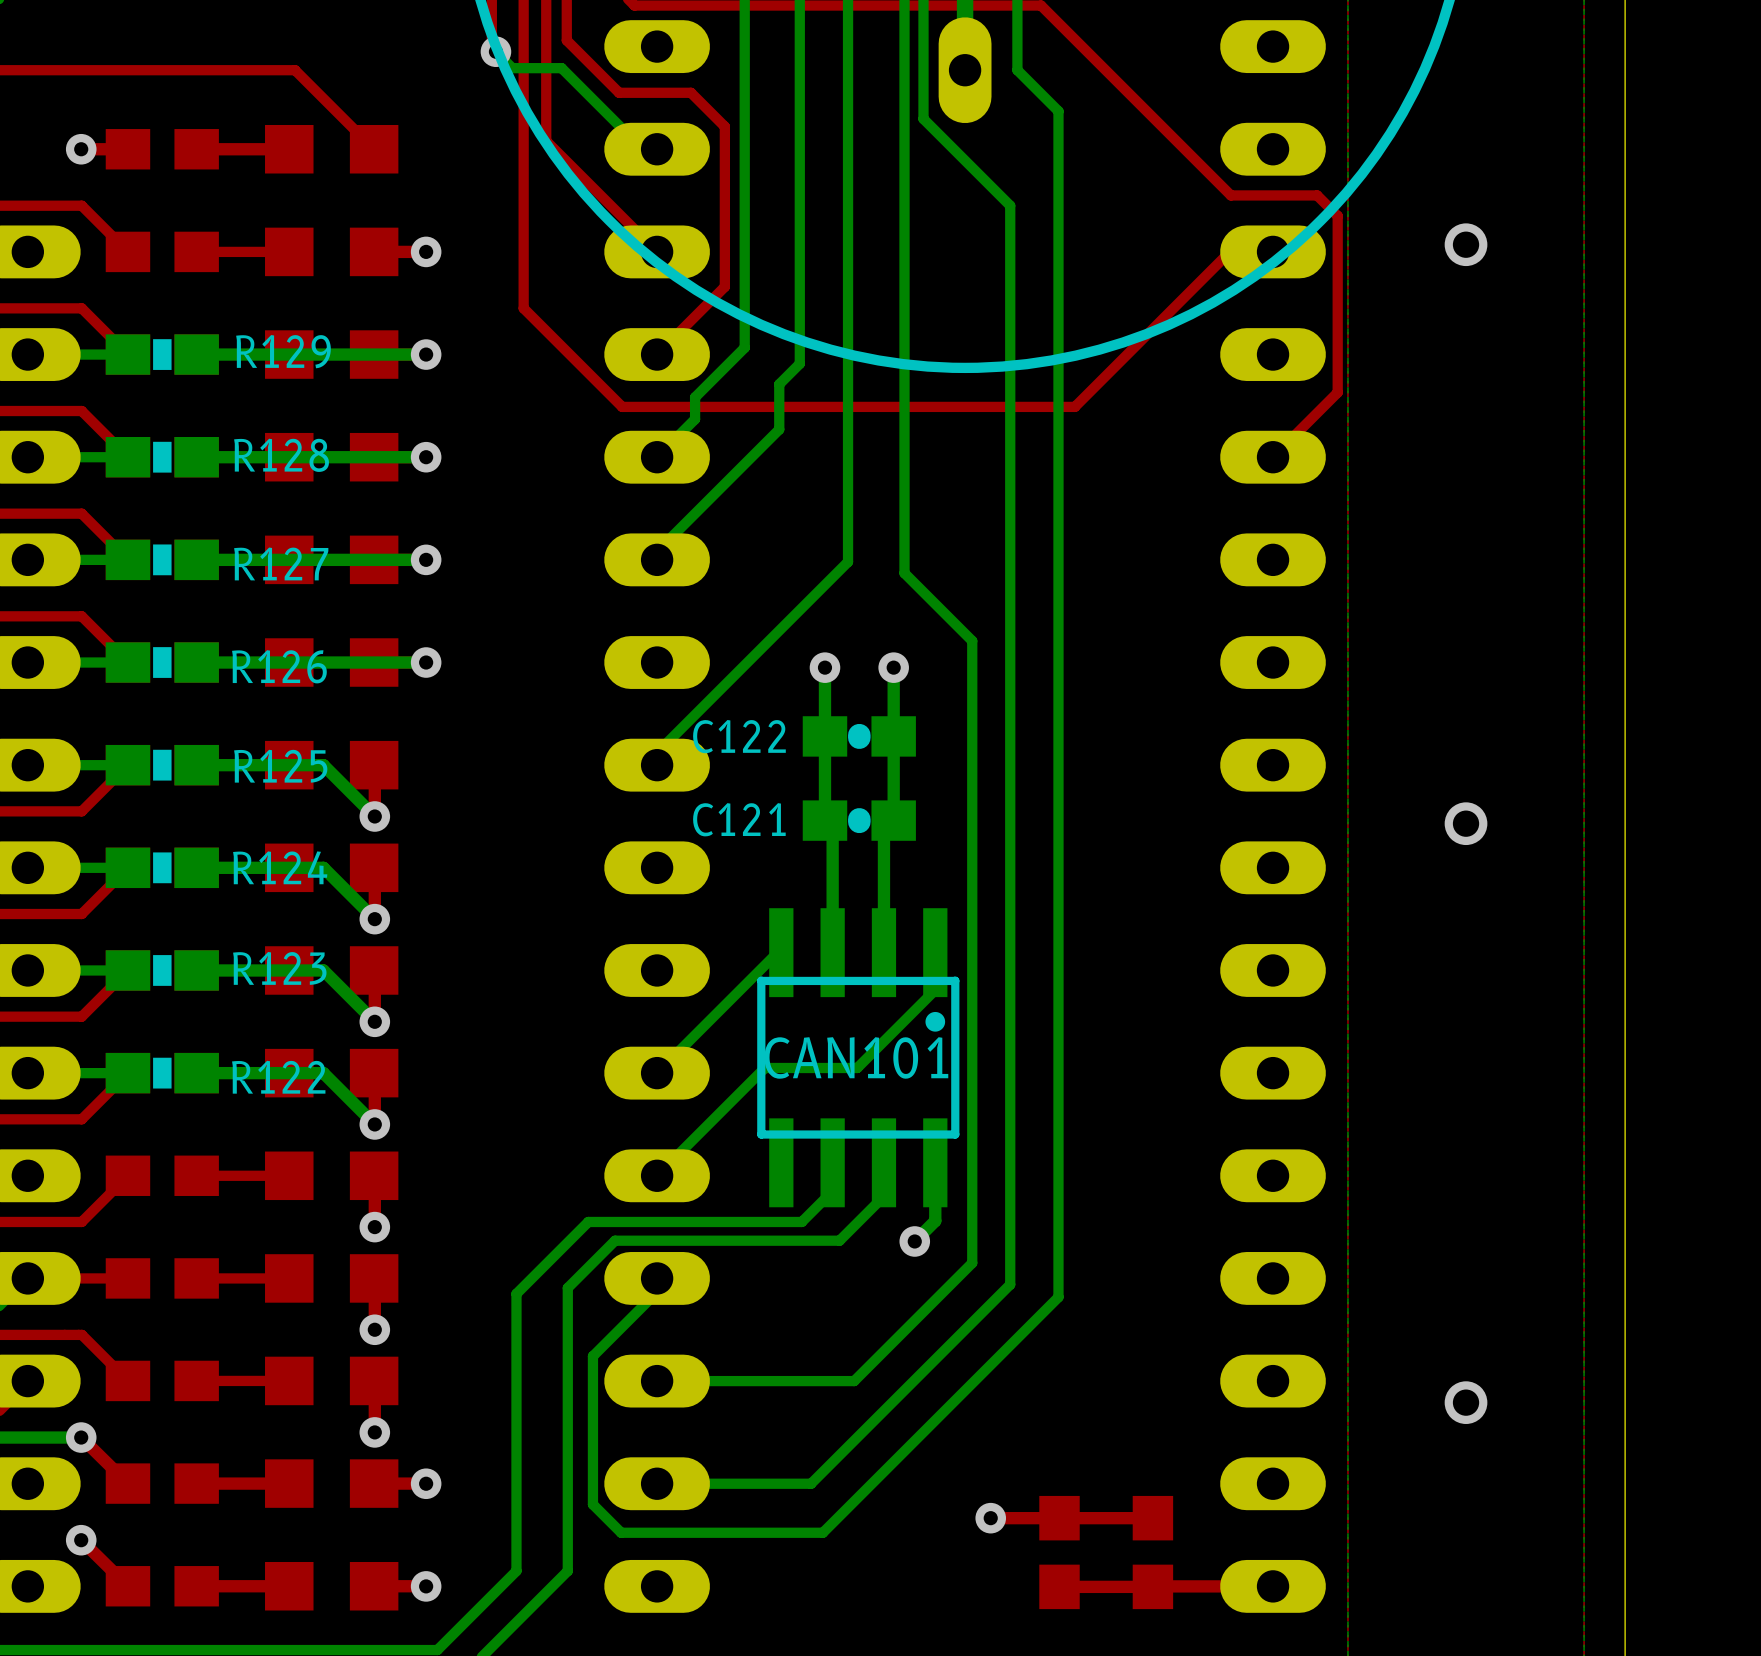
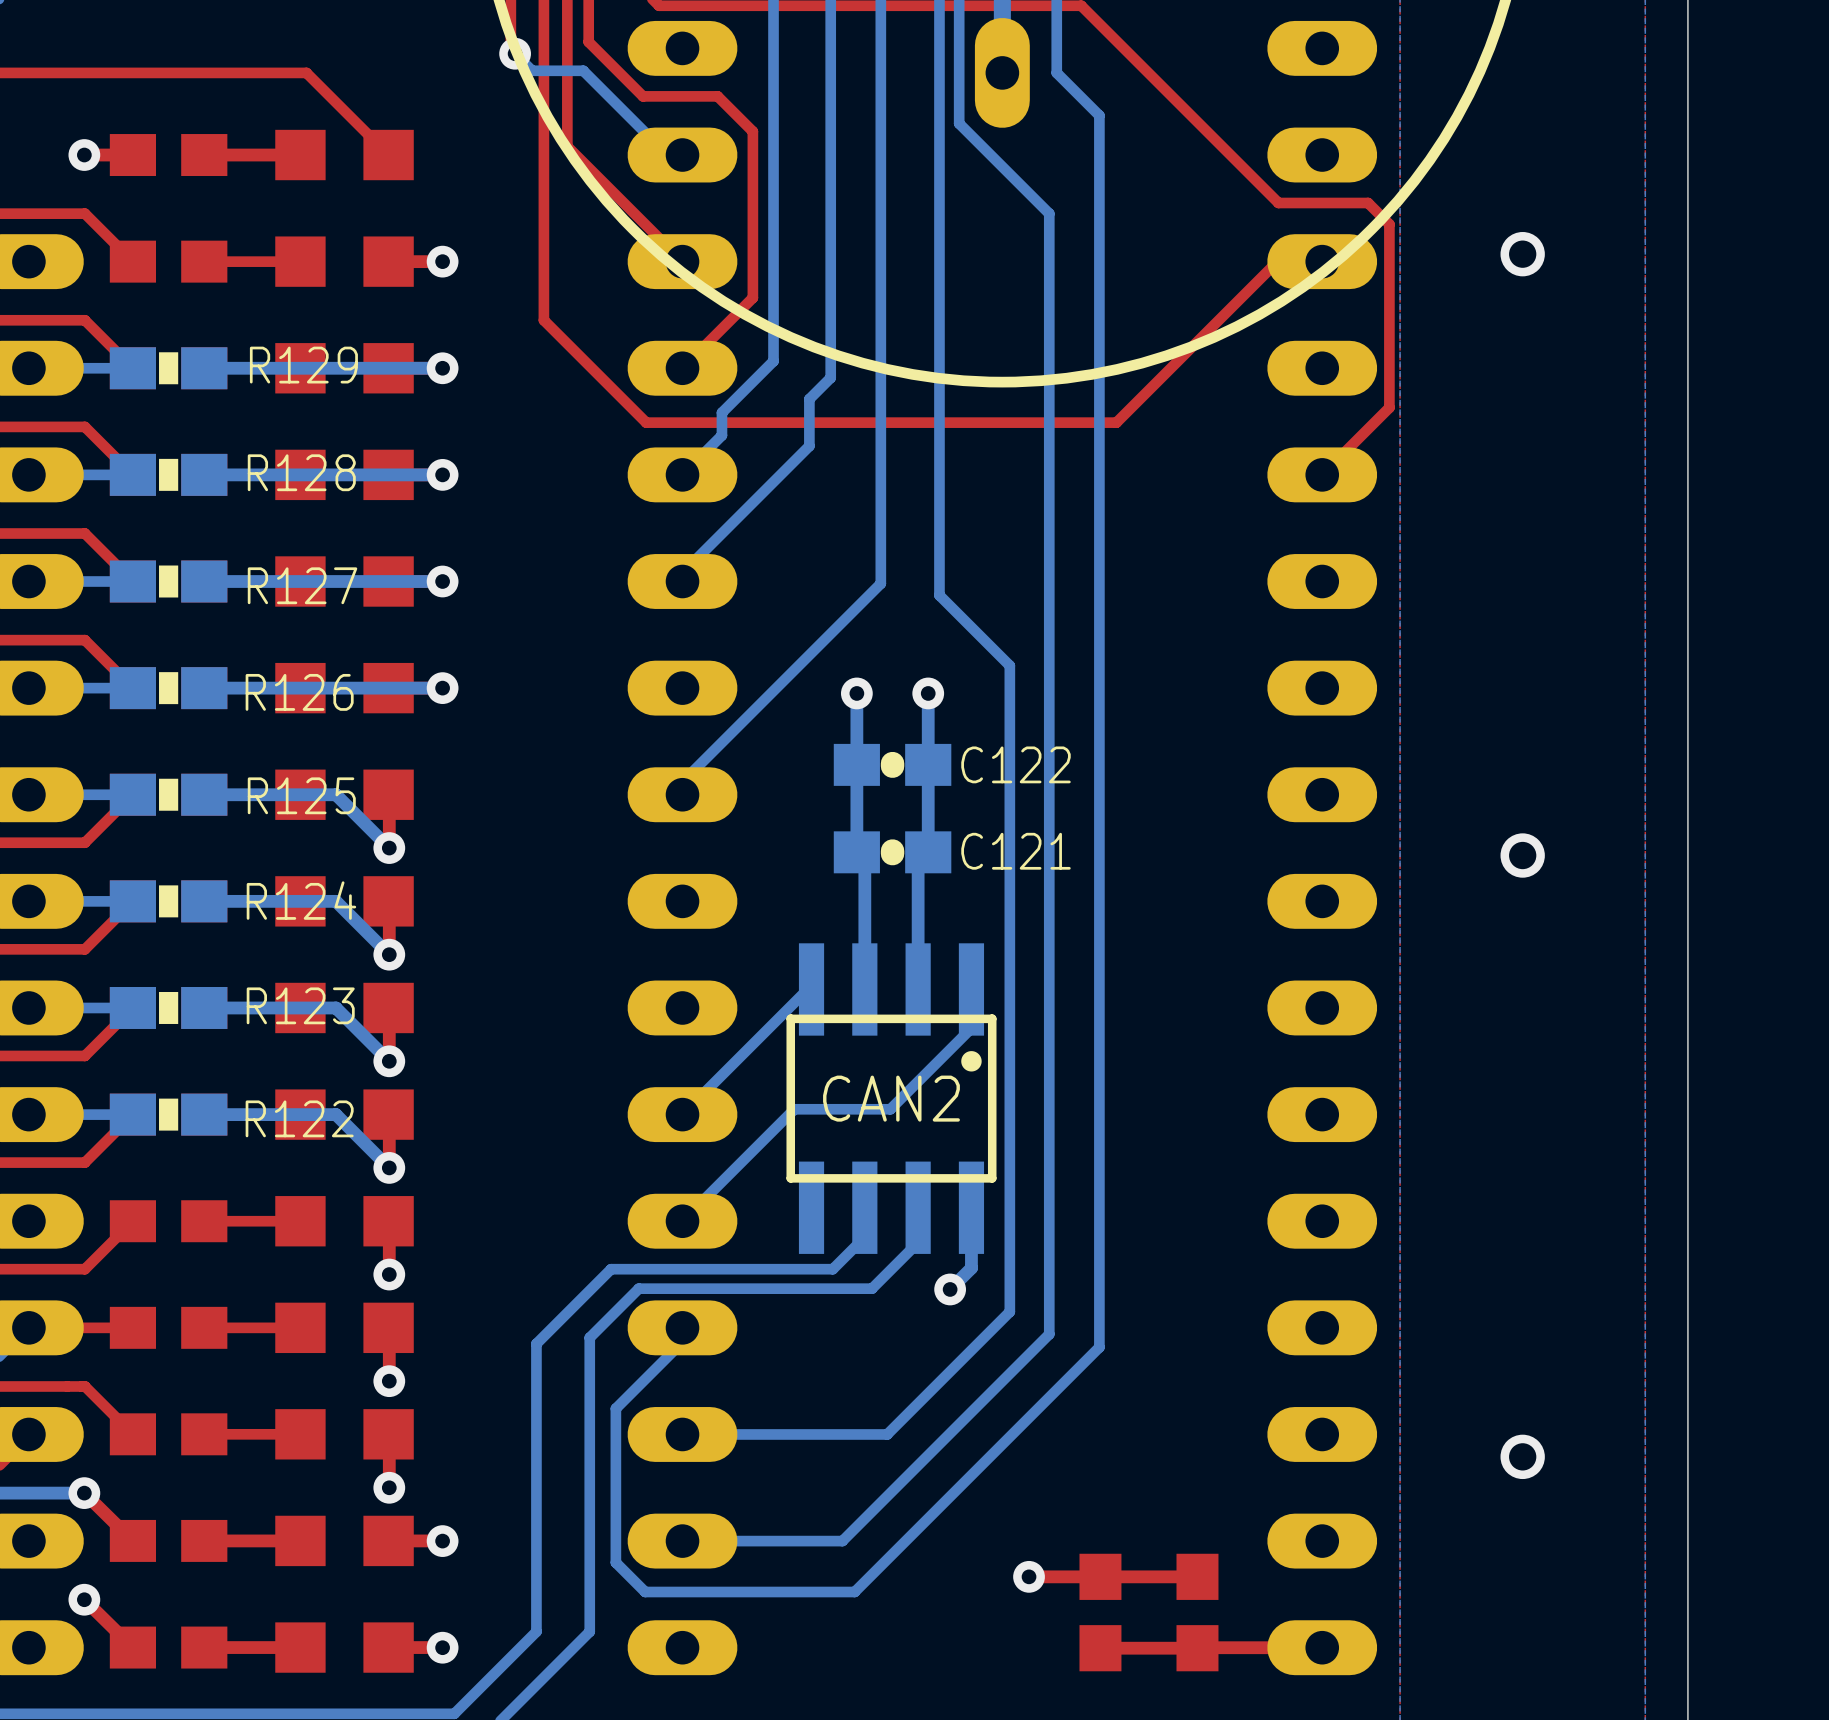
C122 name position: C122 (739, 736) -> C122 (1015, 764)
C121 name position: C121 (739, 819) -> C121 (1015, 851)
CAN101 name: CAN101 (856, 1057) -> CAN2 (891, 1098)

